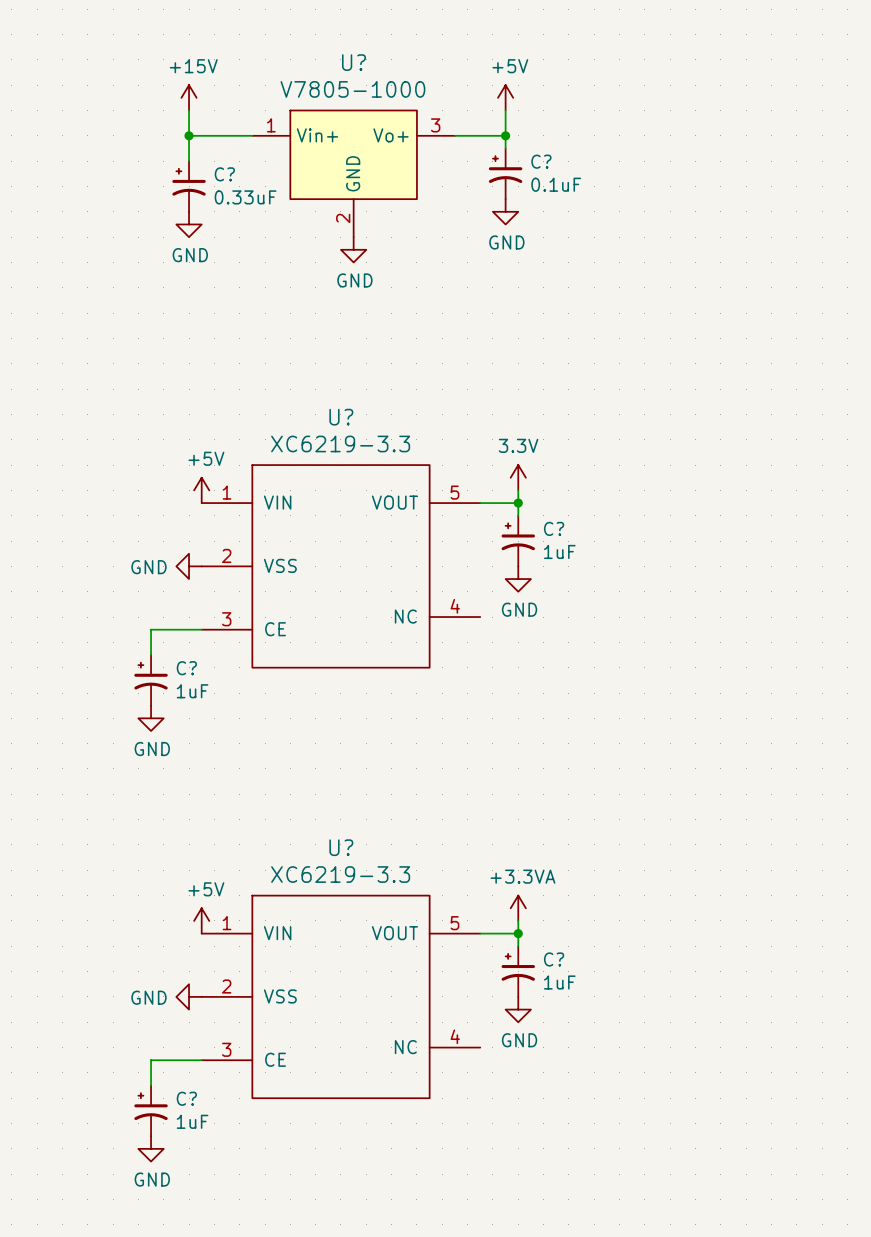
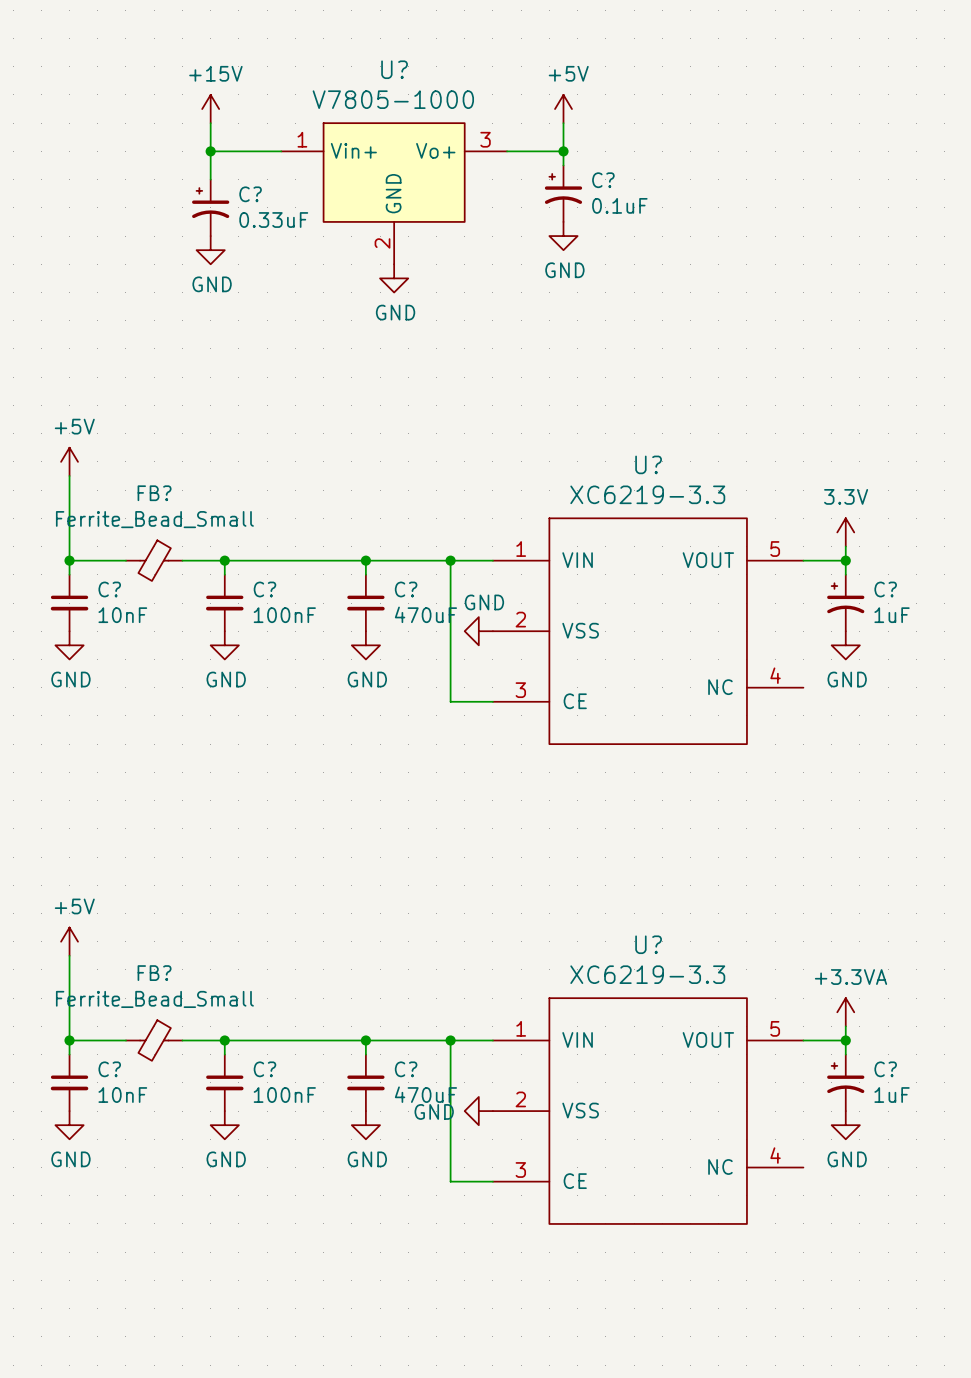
wire: none -> (69, 475) (69, 574)
power symbol position: 3.3V (518, 477) -> 3.3V (845, 532)
power symbol position: +5V (201, 490) -> +5V (69, 461)
wire: (518, 490) (518, 515) -> (845, 546) (845, 574)
wire: none -> (69, 560) (125, 560)
junction: none -> (69, 560)
FB?: none -> Ferrite_Bead_Small (154, 560)
wire: none -> (182, 560) (492, 560)
wire: none -> (224, 560) (224, 574)
junction: none -> (224, 560)
wire: none -> (365, 560) (365, 574)
junction: none -> (365, 560)
wire: none -> (450, 560) (450, 701) (492, 701)
junction: none -> (450, 560)
wire: (480, 503) (518, 503) -> (803, 560) (845, 560)
junction: (518, 503) -> none
junction: none -> (845, 560)
C?: none -> 10nF (69, 603)
C?: none -> 100nF (224, 603)
C?: none -> 470uF (365, 603)
C? position: (518, 541) -> (845, 603)
power symbol rotation: 0° (189, 566) -> 90° counterclockwise (224, 645)
power symbol position: GND (189, 566) -> GND (224, 645)
U? position: (340, 566) -> (648, 631)
power symbol: none -> GND (69, 645)
power symbol: none -> GND (365, 645)
power symbol rotation: 0° (518, 579) -> 90° clockwise (478, 631)
power symbol position: GND (518, 579) -> GND (478, 631)
power symbol: none -> GND (845, 645)
power symbol text position: GND (519, 609) -> GND (484, 602)
wire: (201, 629) (151, 629) (151, 655) -> none
C?: 1uF (151, 680) -> none
power symbol: GND (151, 718) -> none
wire: none -> (69, 955) (69, 1054)
power symbol position: +3.3VA (518, 908) -> +3.3VA (845, 1012)
power symbol position: +5V (201, 920) -> +5V (69, 941)
wire: (518, 920) (518, 946) -> (845, 1026) (845, 1054)
wire: none -> (69, 1040) (125, 1040)
junction: none -> (69, 1040)
FB?: none -> Ferrite_Bead_Small (154, 1040)
wire: none -> (182, 1040) (492, 1040)
wire: none -> (224, 1040) (224, 1054)
junction: none -> (224, 1040)
wire: none -> (365, 1040) (365, 1054)
junction: none -> (365, 1040)
wire: none -> (450, 1040) (450, 1181) (492, 1181)
junction: none -> (450, 1040)
wire: (480, 933) (518, 933) -> (803, 1040) (845, 1040)
junction: (518, 933) -> none
junction: none -> (845, 1040)
C?: none -> 10nF (69, 1082)
C?: none -> 100nF (224, 1082)
C?: none -> 470uF (365, 1082)
C? position: (518, 971) -> (845, 1082)
power symbol rotation: 0° (189, 996) -> 90° counterclockwise (224, 1125)
power symbol position: GND (189, 996) -> GND (224, 1125)
U? position: (340, 996) -> (648, 1111)
power symbol: none -> GND (69, 1125)
power symbol: none -> GND (365, 1125)
power symbol rotation: 0° (518, 1009) -> 90° clockwise (478, 1111)
power symbol position: GND (518, 1009) -> GND (478, 1111)
power symbol: none -> GND (845, 1125)
wire: (201, 1060) (151, 1060) (151, 1085) -> none
C?: 1uF (151, 1110) -> none
power symbol: GND (151, 1148) -> none

